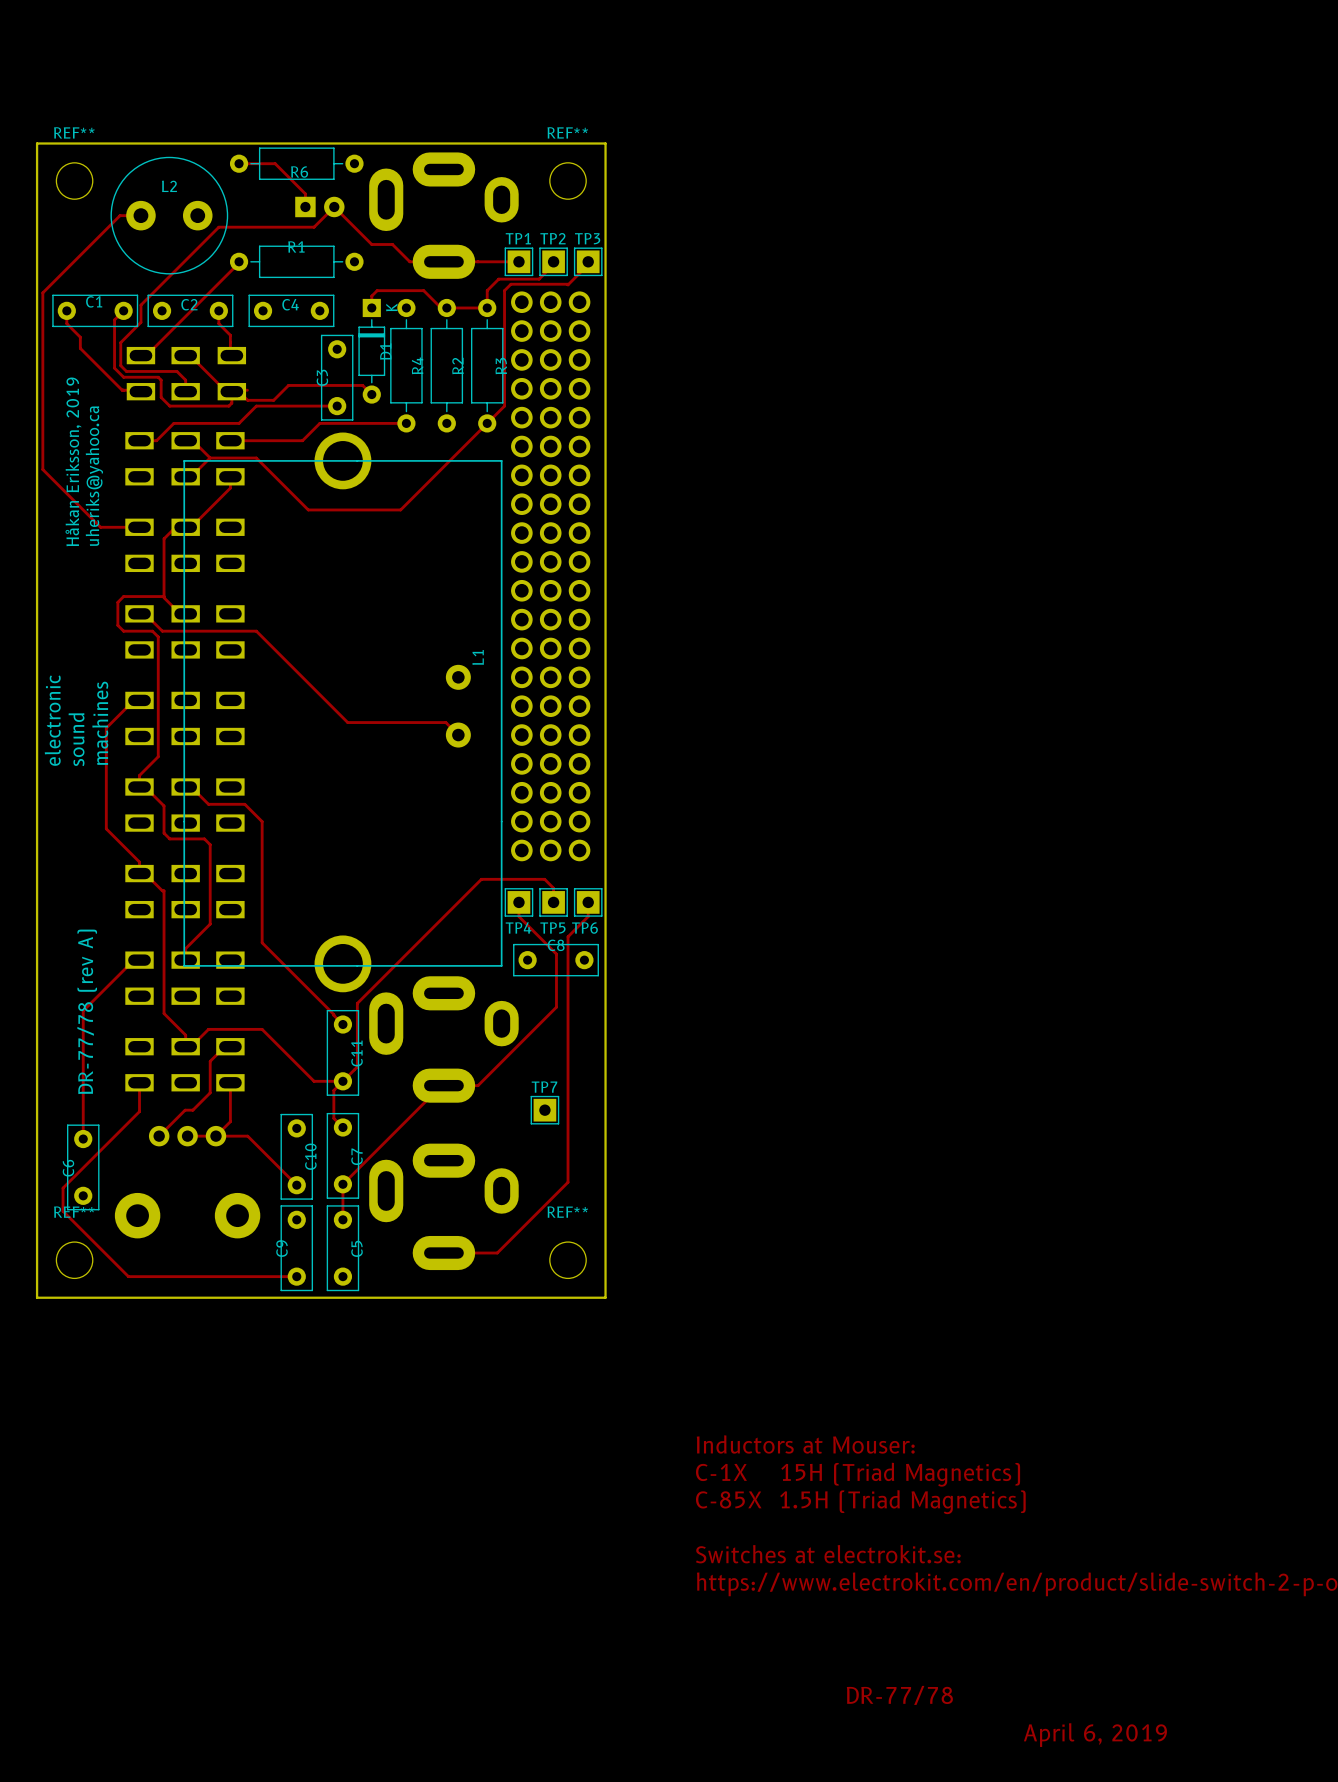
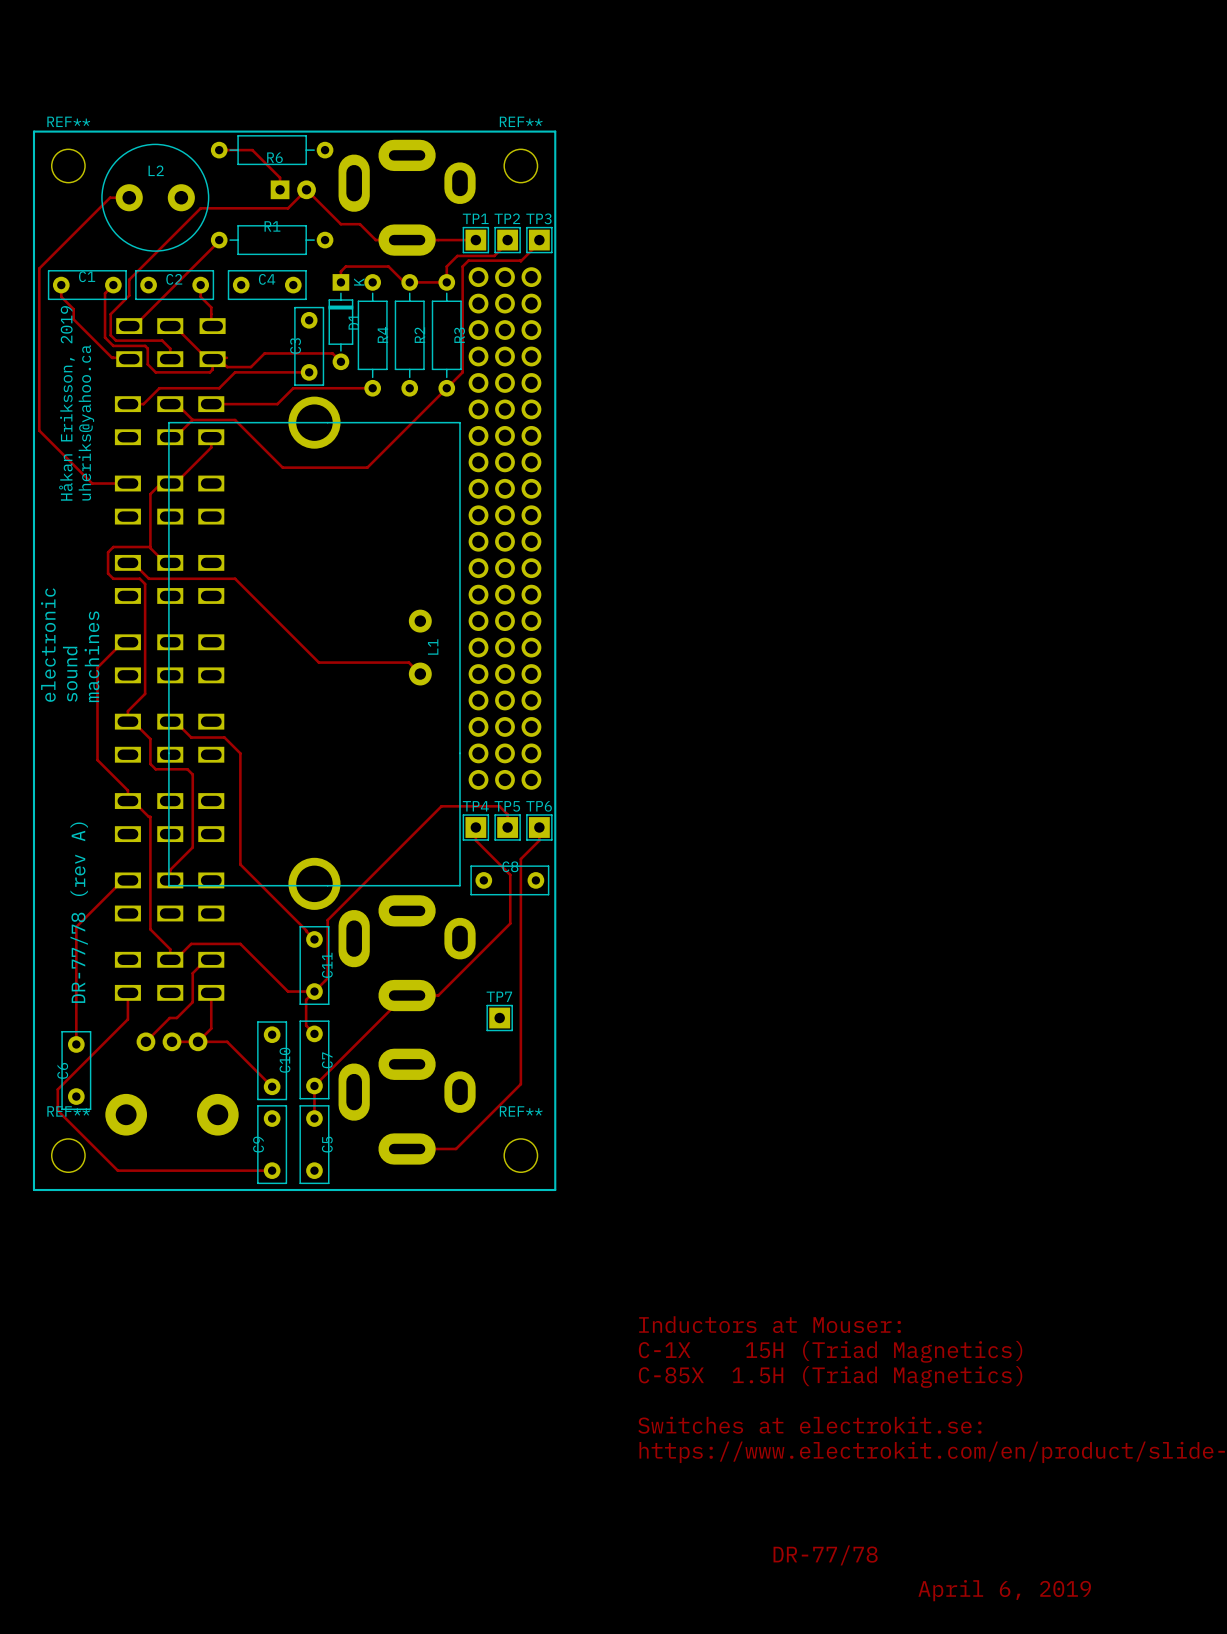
board edge: (37, 143) (37, 1297) (605, 1297) (605, 143) (37, 143) -> none
line: none -> (33, 131) (33, 1190) (555, 1190) (555, 131) (33, 131)
L1 name position: L1 (478, 657) -> L1 (433, 647)
TP4 name position: TP4 (518, 927) -> TP4 (475, 806)
TP5 name position: TP5 (552, 927) -> TP5 (507, 806)
TP6 name position: TP6 (584, 928) -> TP6 (539, 806)

